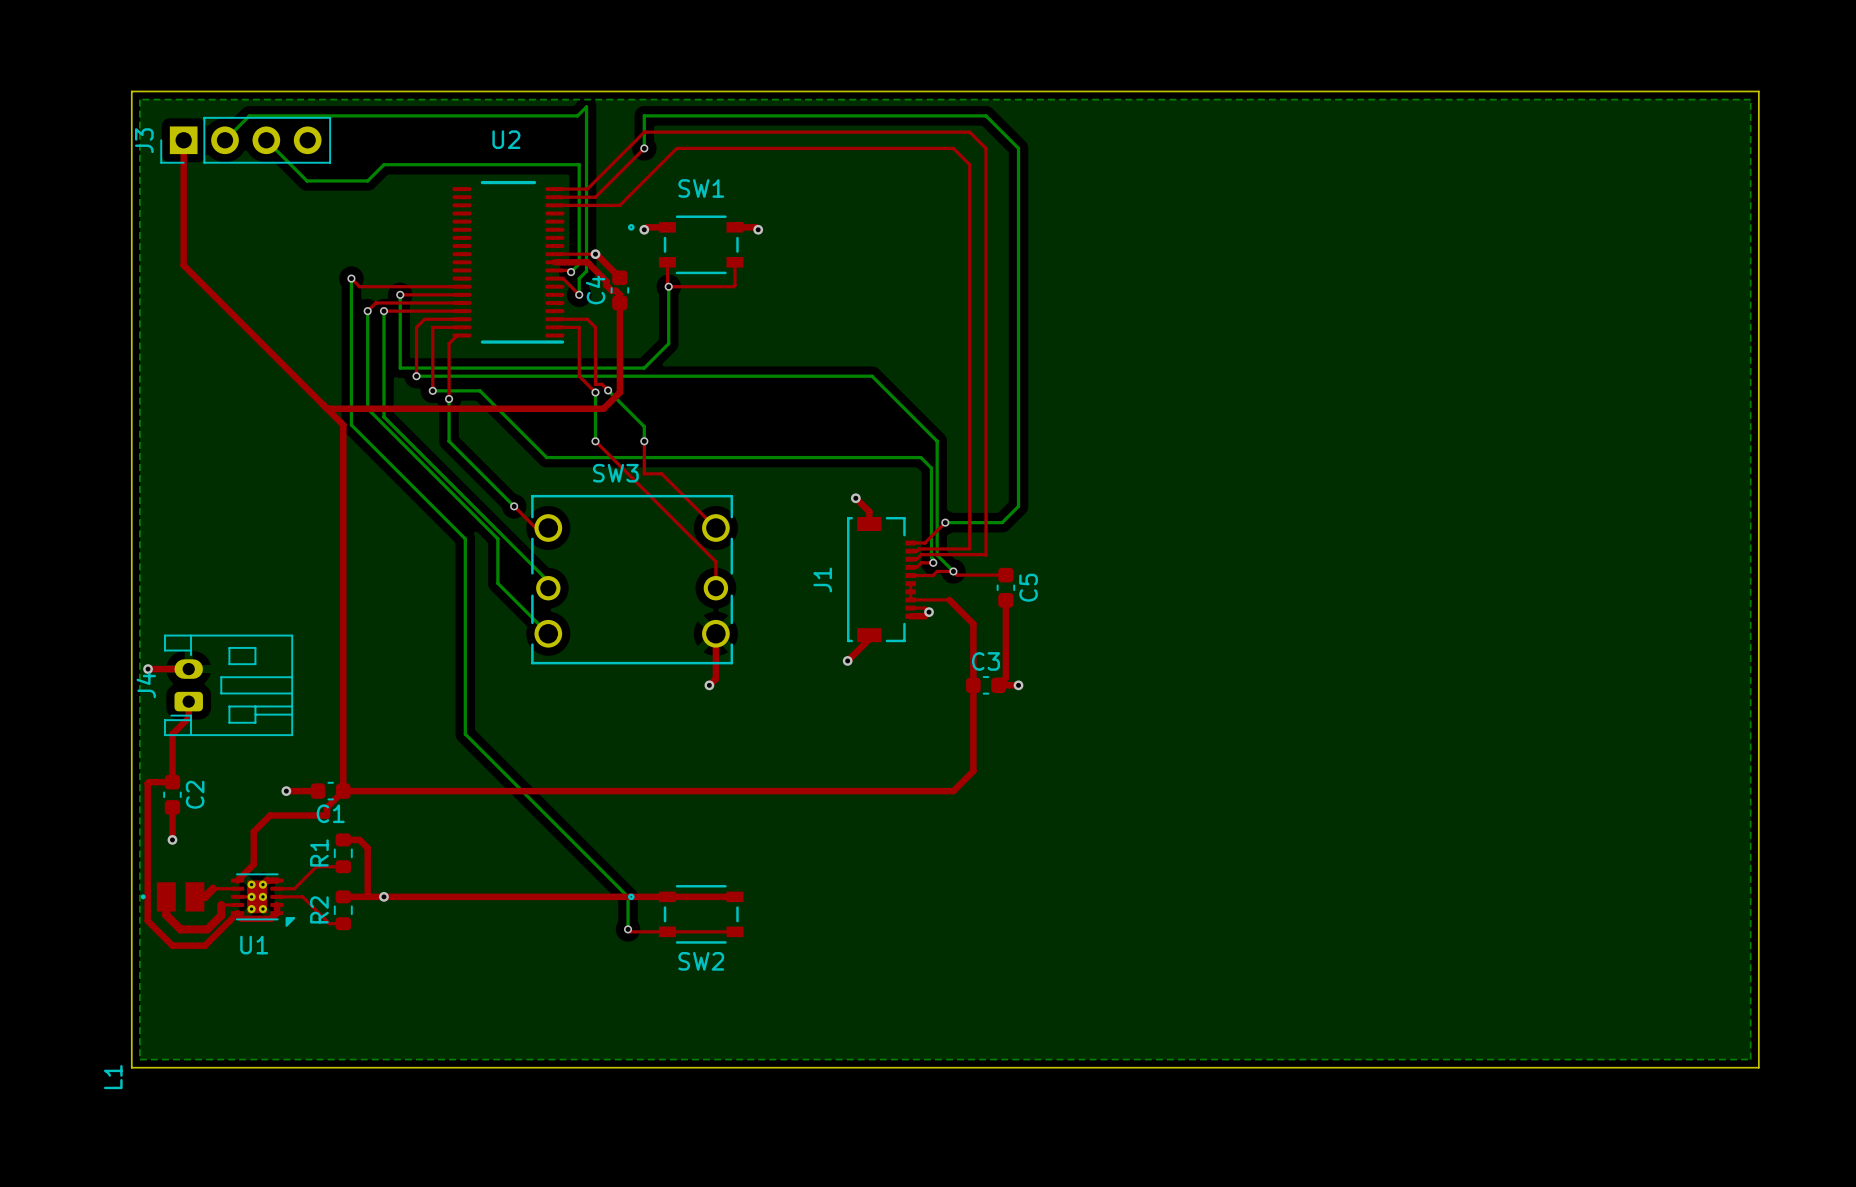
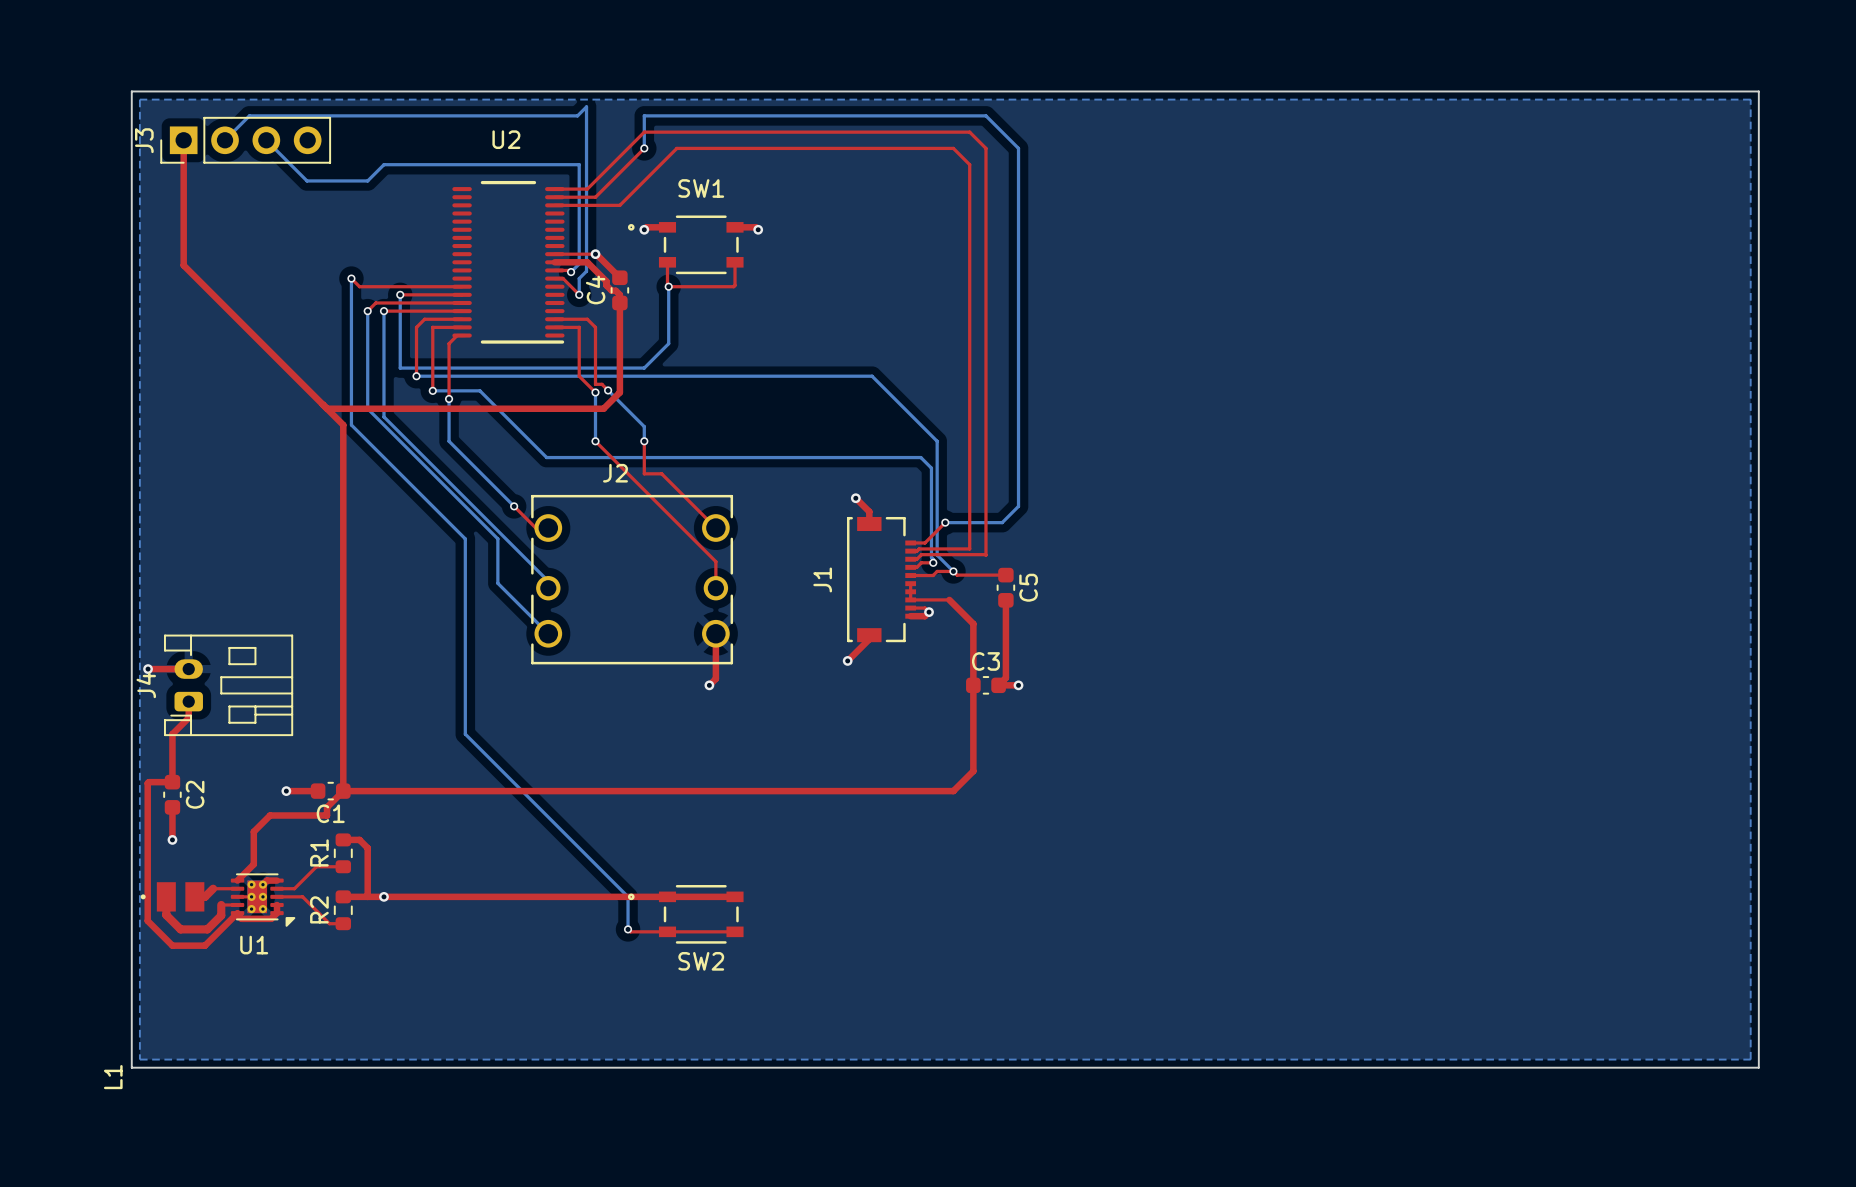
SW3 name: SW3 (615, 473) -> J2 (615, 473)

